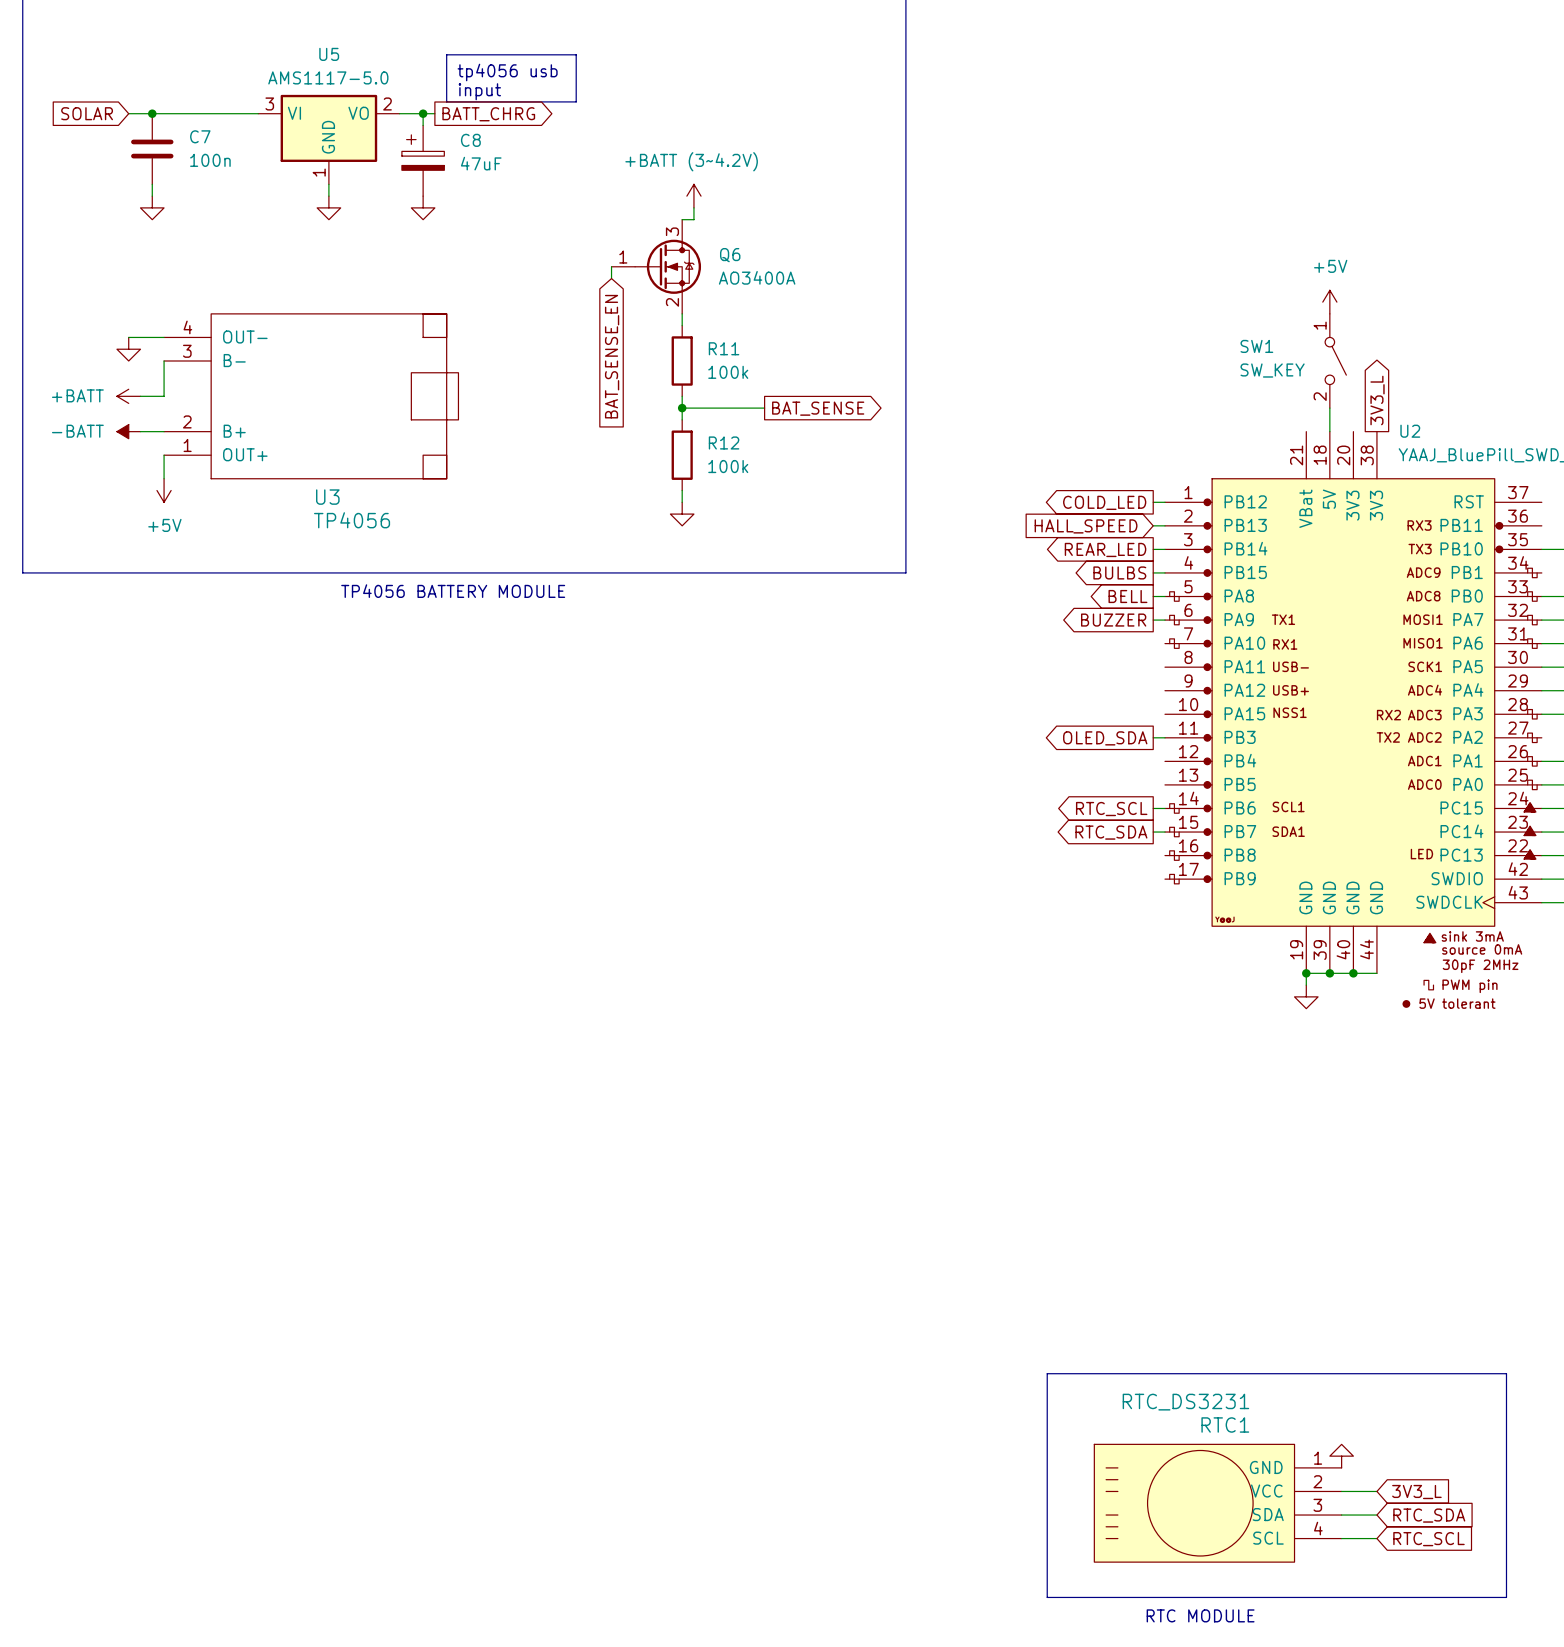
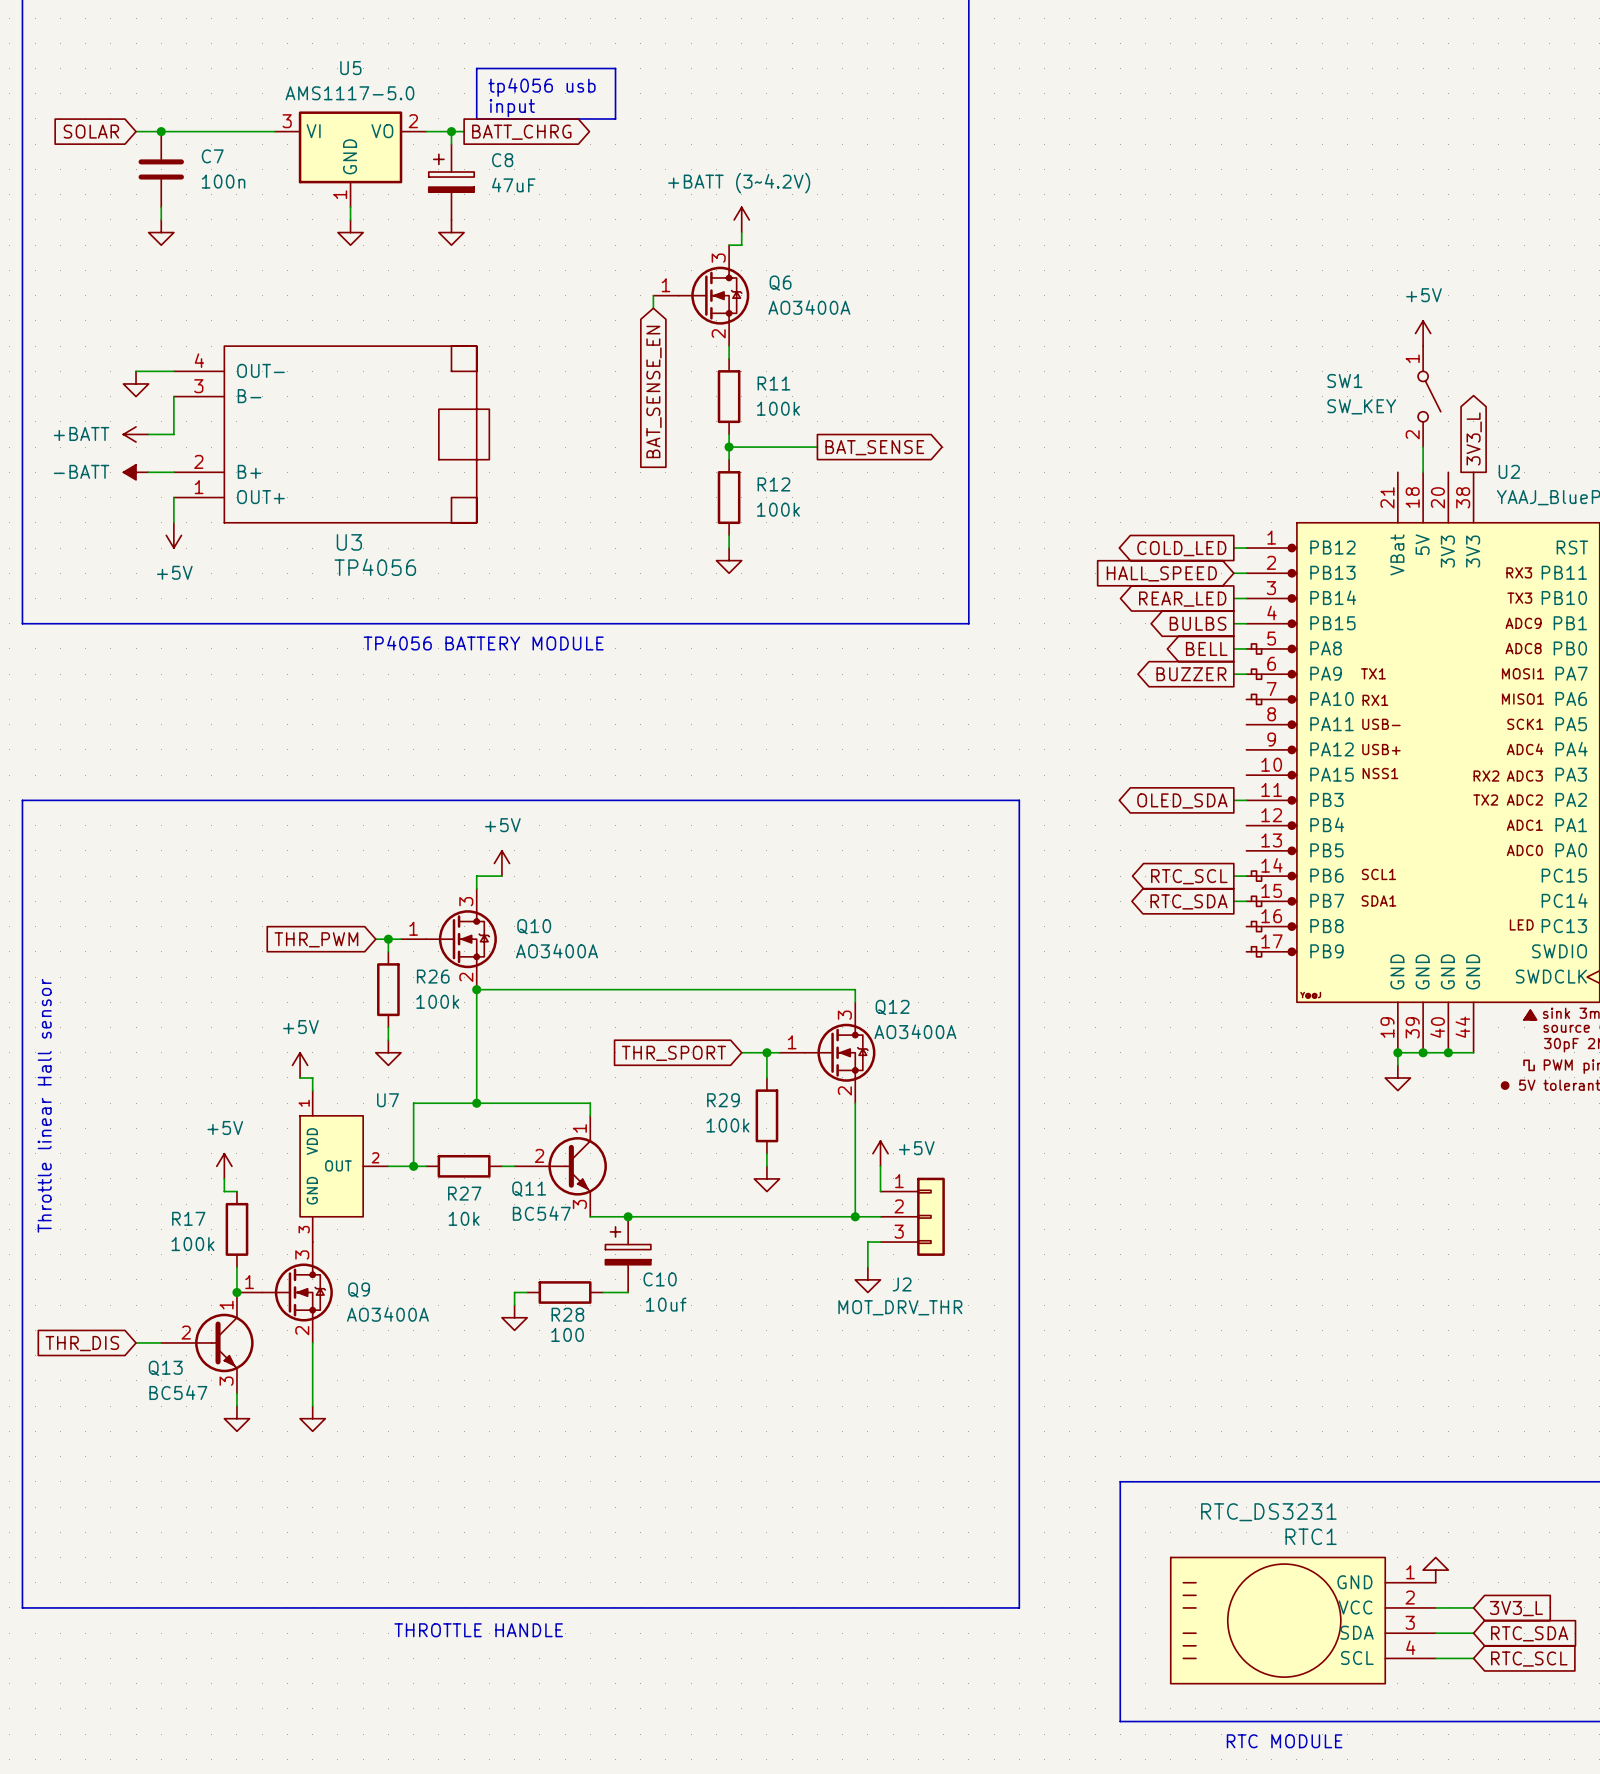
line: none -> (22, 800) (1019, 800) (1019, 1607) (22, 1607) (22, 800)
power symbol: none -> +5V (501, 863)
wire: none -> (501, 876) (476, 876) (476, 888)
global label: none -> THR_PWM (316, 939)
wire: none -> (375, 939) (401, 939)
wire: none -> (388, 939) (388, 951)
junction: none -> (388, 939)
Q10: none -> AO3400A (448, 939)
R26: none -> 100k (388, 989)
junction: none -> (476, 989)
wire: none -> (855, 1002) (855, 989) (476, 989) (476, 1103)
wire: none -> (388, 1027) (388, 1040)
power symbol: none -> (388, 1052)
global label: none -> THR_SPORT (673, 1053)
wire: none -> (741, 1052) (779, 1052)
wire: none -> (766, 1052) (766, 1077)
junction: none -> (766, 1052)
Q12: none -> AO3400A (827, 1052)
power symbol: none -> +5V (300, 1065)
wire: none -> (300, 1077) (312, 1077) (312, 1090)
junction: none -> (476, 1103)
wire: none -> (855, 1103) (855, 1216)
text: none -> Throttle linear Hall sensor (44, 1105)
wire: none -> (590, 1115) (590, 1103) (413, 1103) (413, 1166)
R29: none -> 100k (766, 1115)
wire: none -> (766, 1153) (766, 1166)
power symbol: none -> +5V (880, 1153)
power symbol: none -> +5V (224, 1166)
U7: none -> (344, 1166)
wire: none -> (388, 1166) (426, 1166)
junction: none -> (413, 1166)
R27: none -> 10k (464, 1166)
wire: none -> (501, 1166) (514, 1166)
Q11: none -> BC547 (560, 1166)
wire: none -> (880, 1166) (880, 1191)
wire: none -> (224, 1178) (224, 1191) (236, 1191)
power symbol: none -> (766, 1178)
wire: none -> (590, 1216) (880, 1216)
junction: none -> (628, 1216)
junction: none -> (855, 1216)
J2: none -> MOT_DRV_THR (912, 1216)
R17: none -> 100k (236, 1229)
wire: none -> (880, 1242) (867, 1242) (867, 1267)
C10: none -> 10uf (628, 1254)
wire: none -> (236, 1267) (236, 1292)
power symbol: none -> (867, 1279)
junction: none -> (236, 1292)
Q9: none -> AO3400A (284, 1292)
wire: none -> (527, 1292) (514, 1292) (514, 1305)
R28: none -> 100 (565, 1292)
wire: none -> (602, 1292) (628, 1292)
power symbol: none -> (514, 1317)
global label: none -> THR_DIS (82, 1343)
wire: none -> (136, 1342) (161, 1342)
Q13: none -> BC547 (207, 1342)
wire: none -> (312, 1342) (312, 1406)
wire: none -> (236, 1393) (236, 1406)
power symbol: none -> (236, 1418)
power symbol: none -> (312, 1418)
text: none -> THROTTLE HANDLE (478, 1630)

